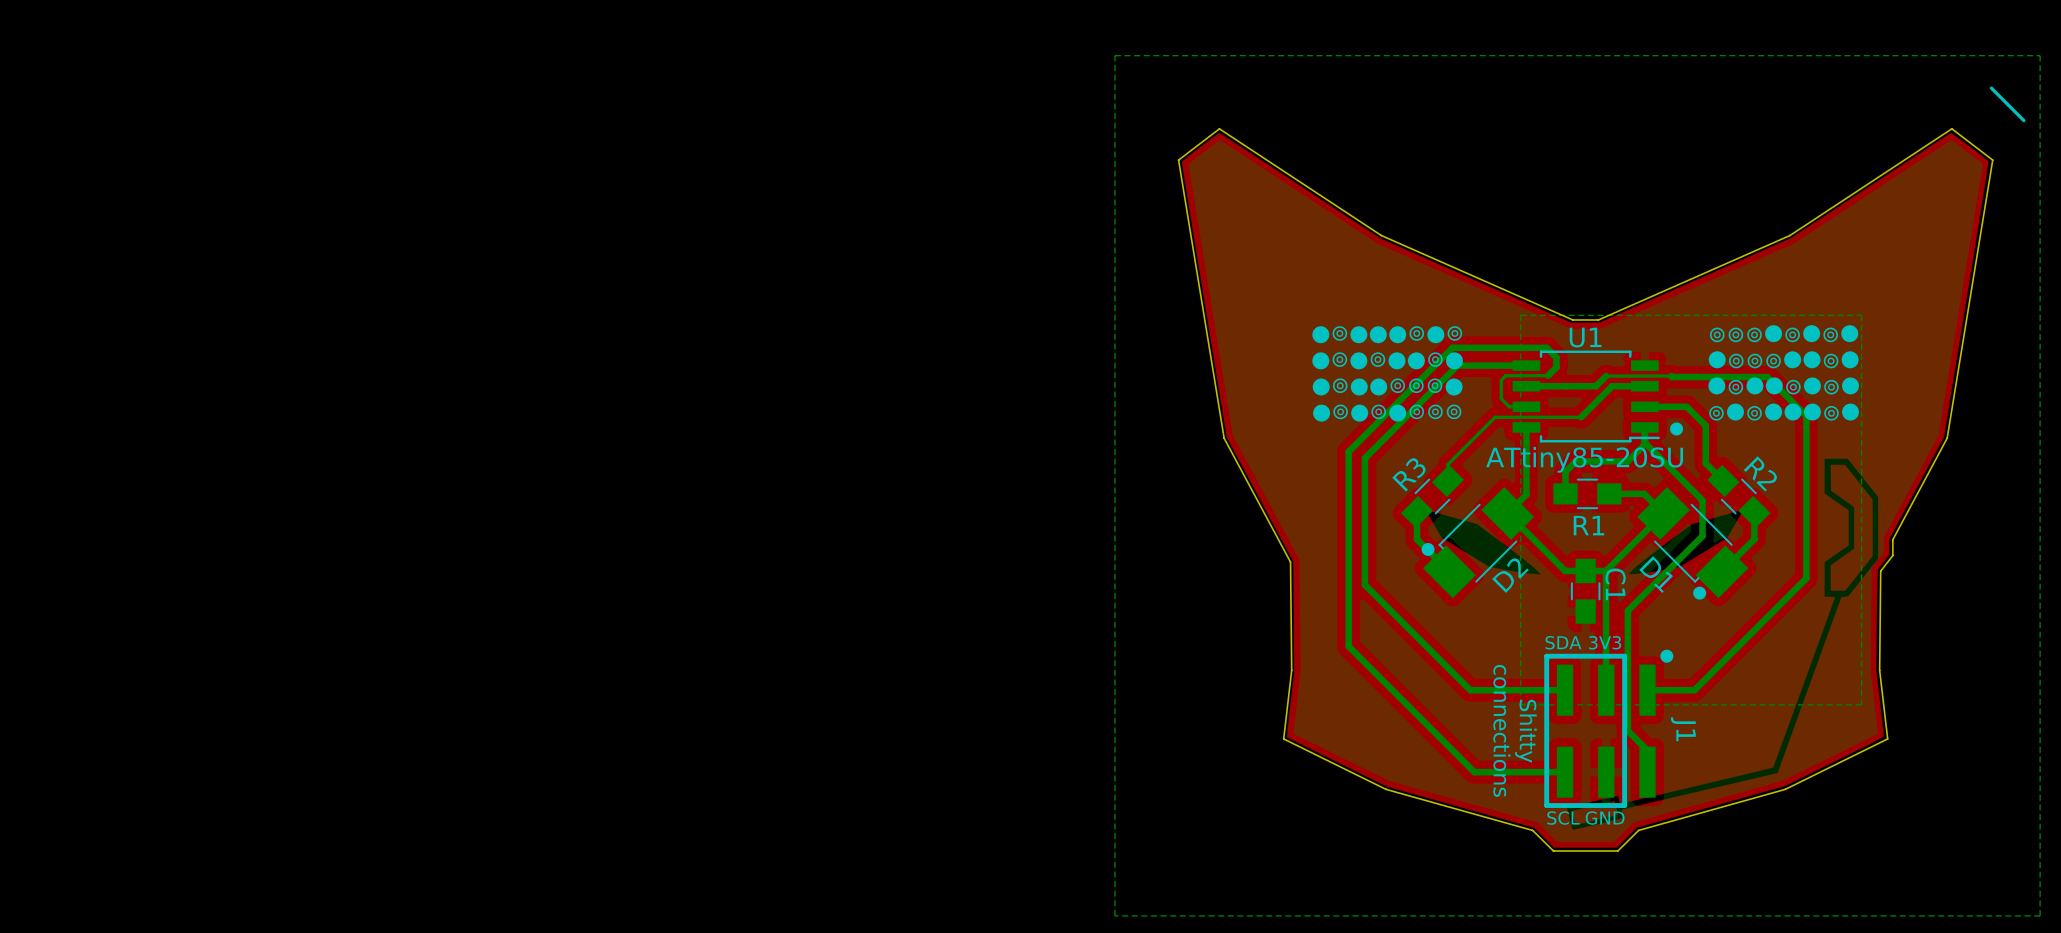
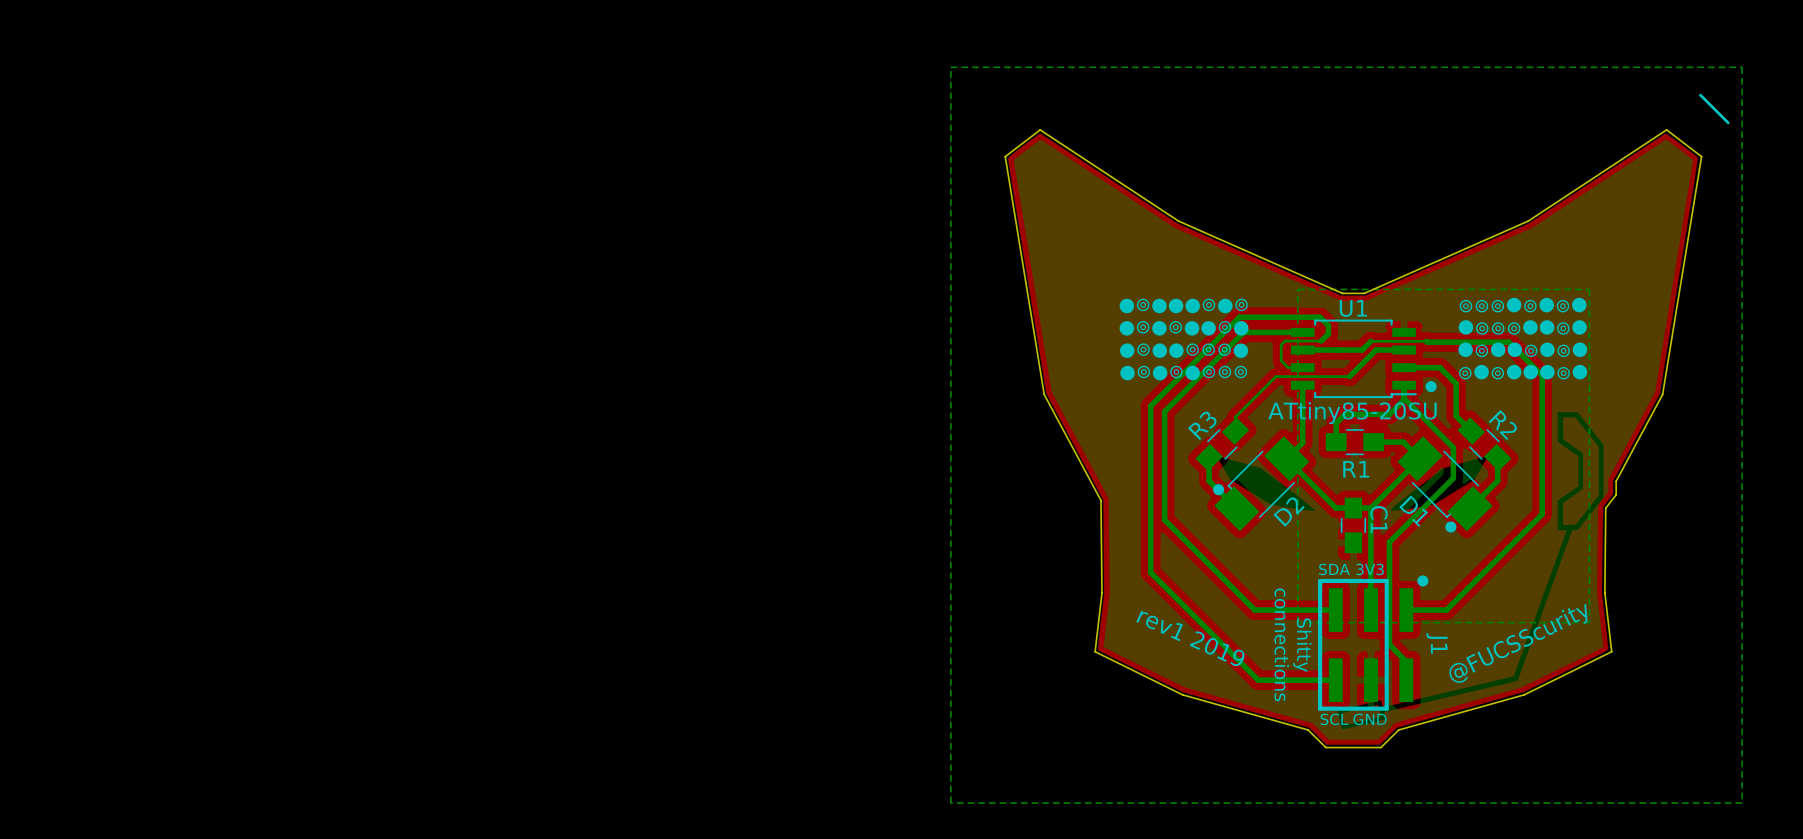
text: none -> rev1 2019 (1190, 638)
text: none -> @FUCSScurity (1518, 643)

